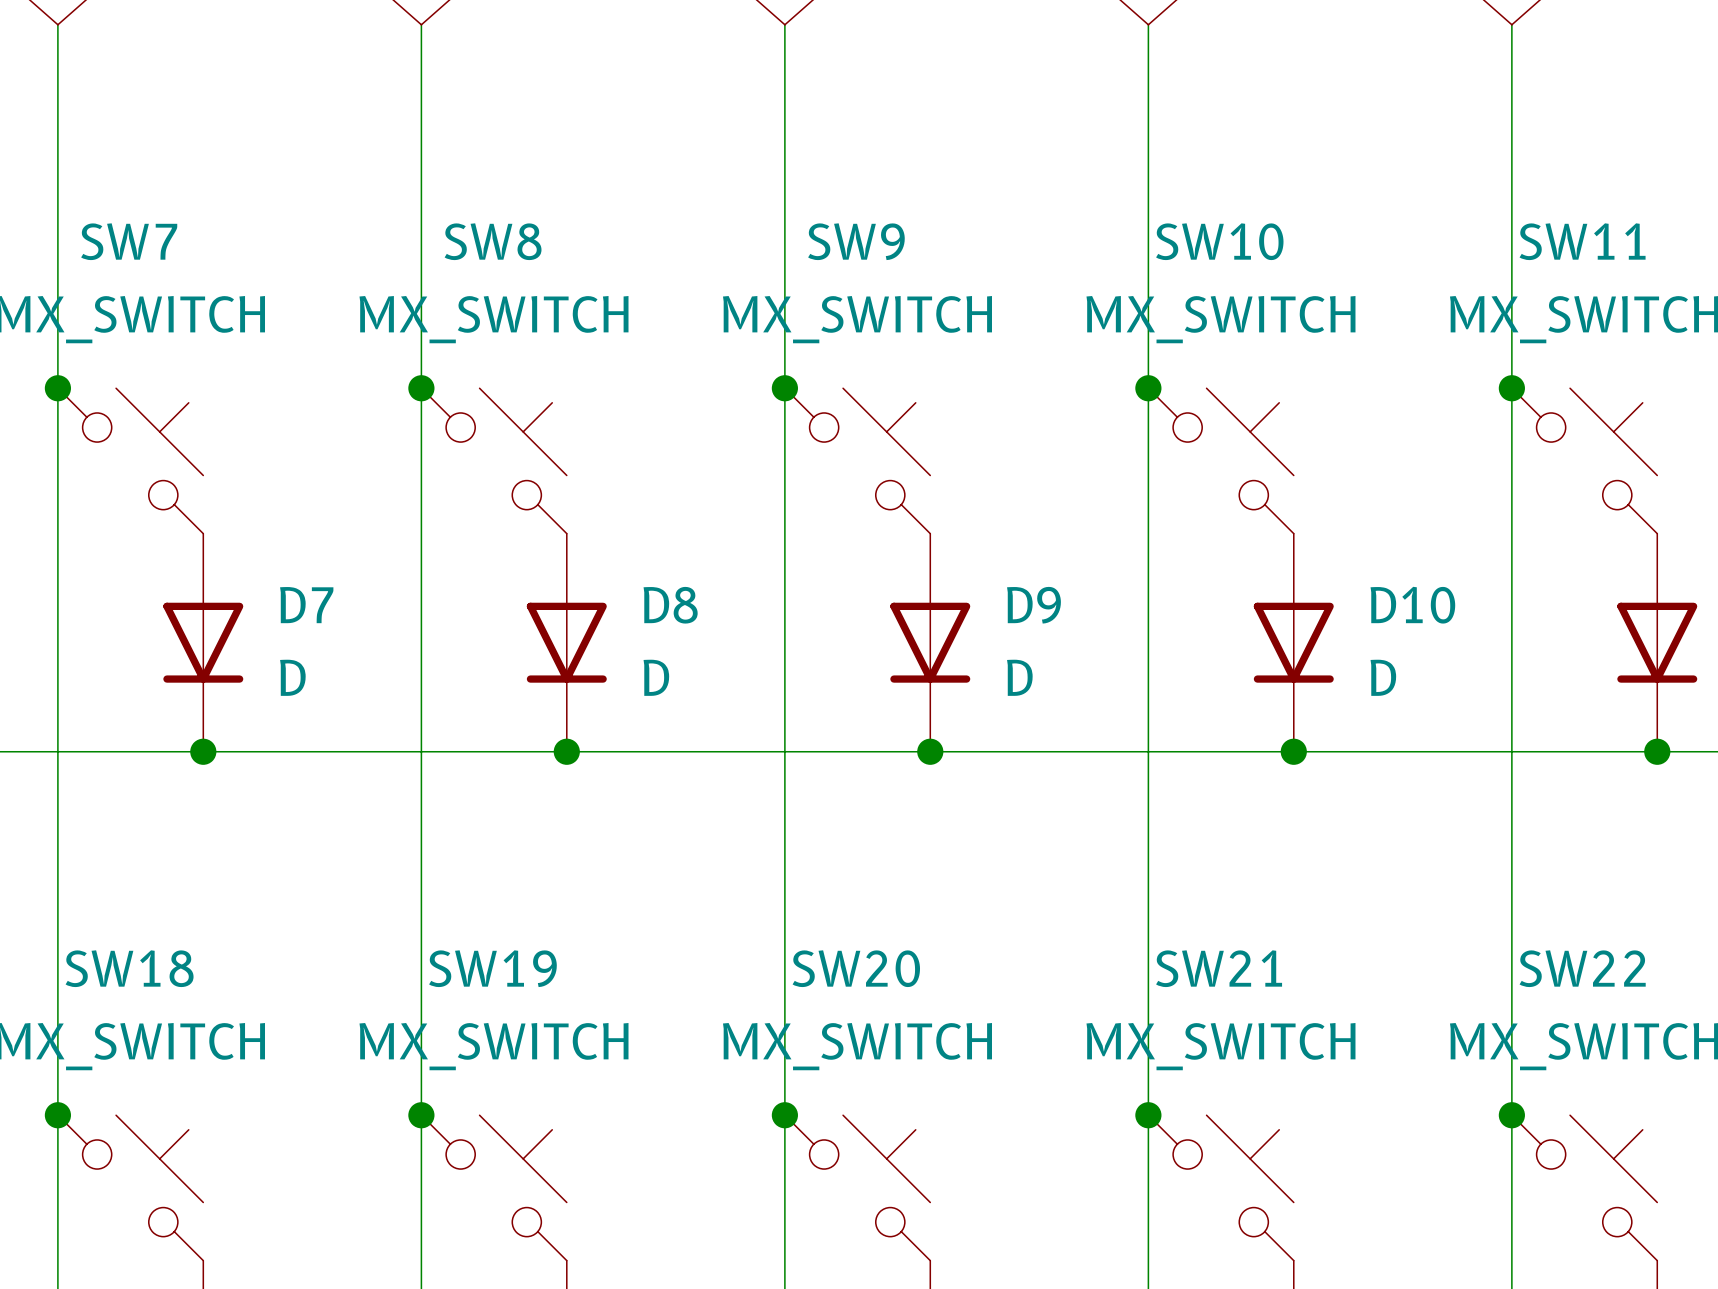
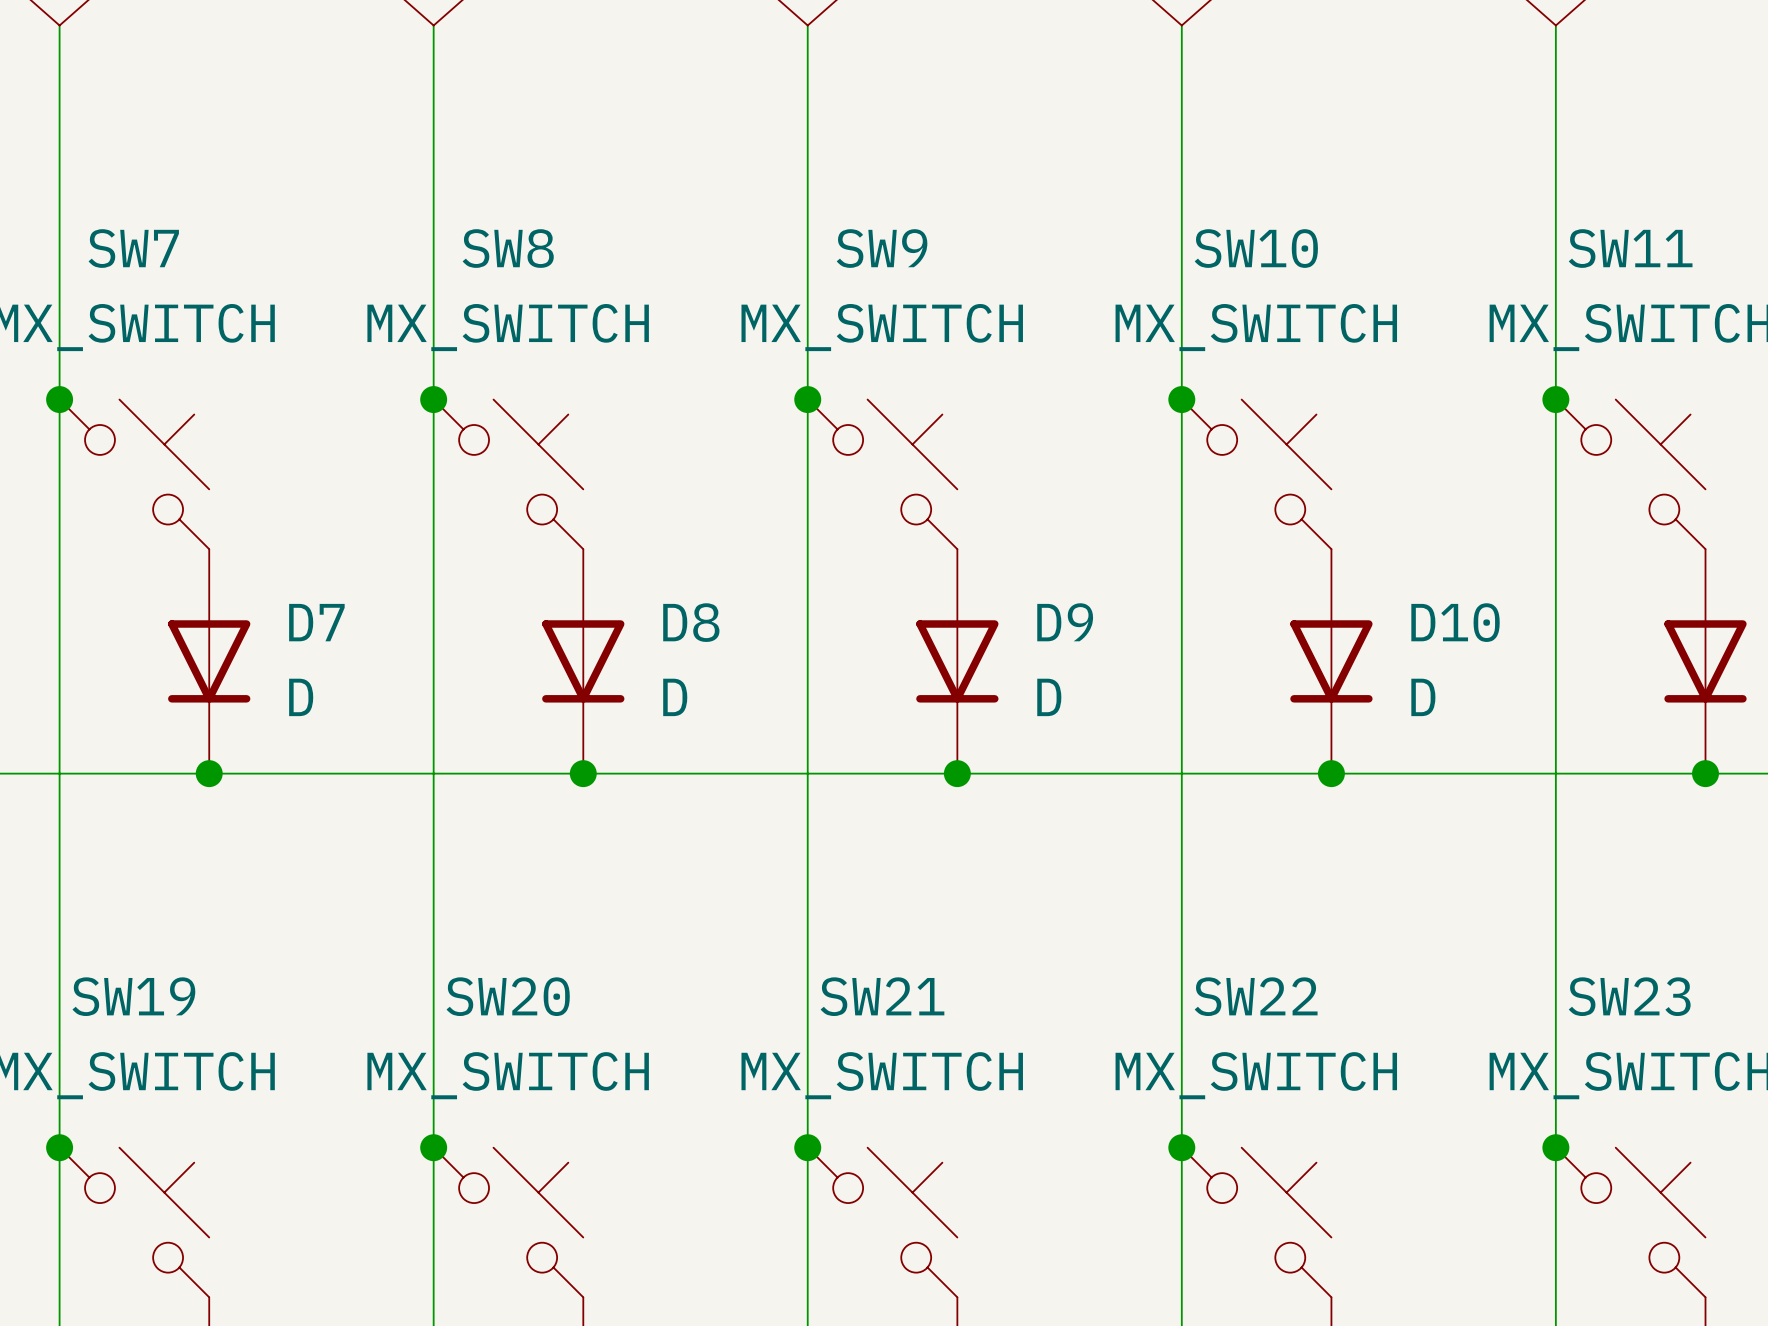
SW18 name: SW18 (129, 968) -> SW19 (133, 996)
SW19 name: SW19 (492, 968) -> SW20 (508, 996)
SW20 name: SW20 (856, 968) -> SW21 (882, 996)
SW21 name: SW21 (1219, 968) -> SW22 (1256, 996)
SW22 name: SW22 (1582, 968) -> SW23 (1629, 996)

